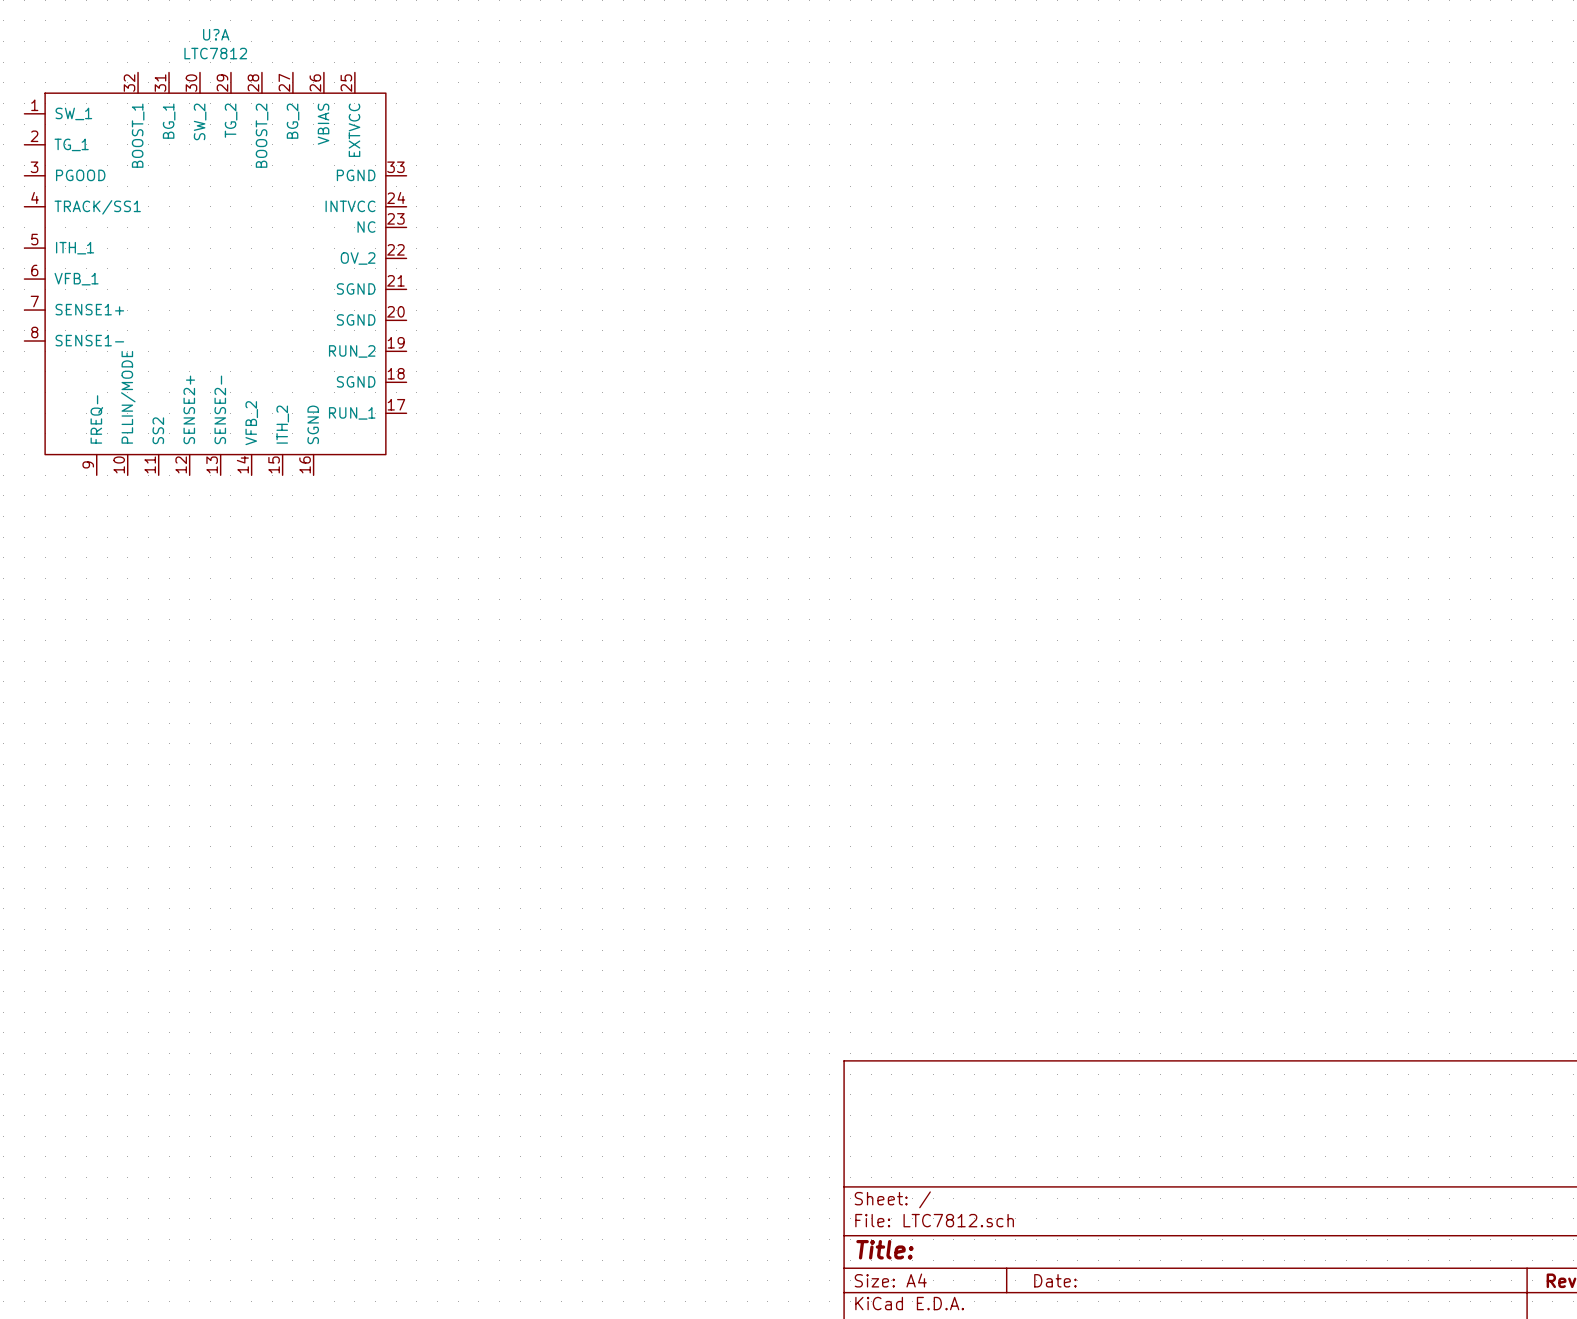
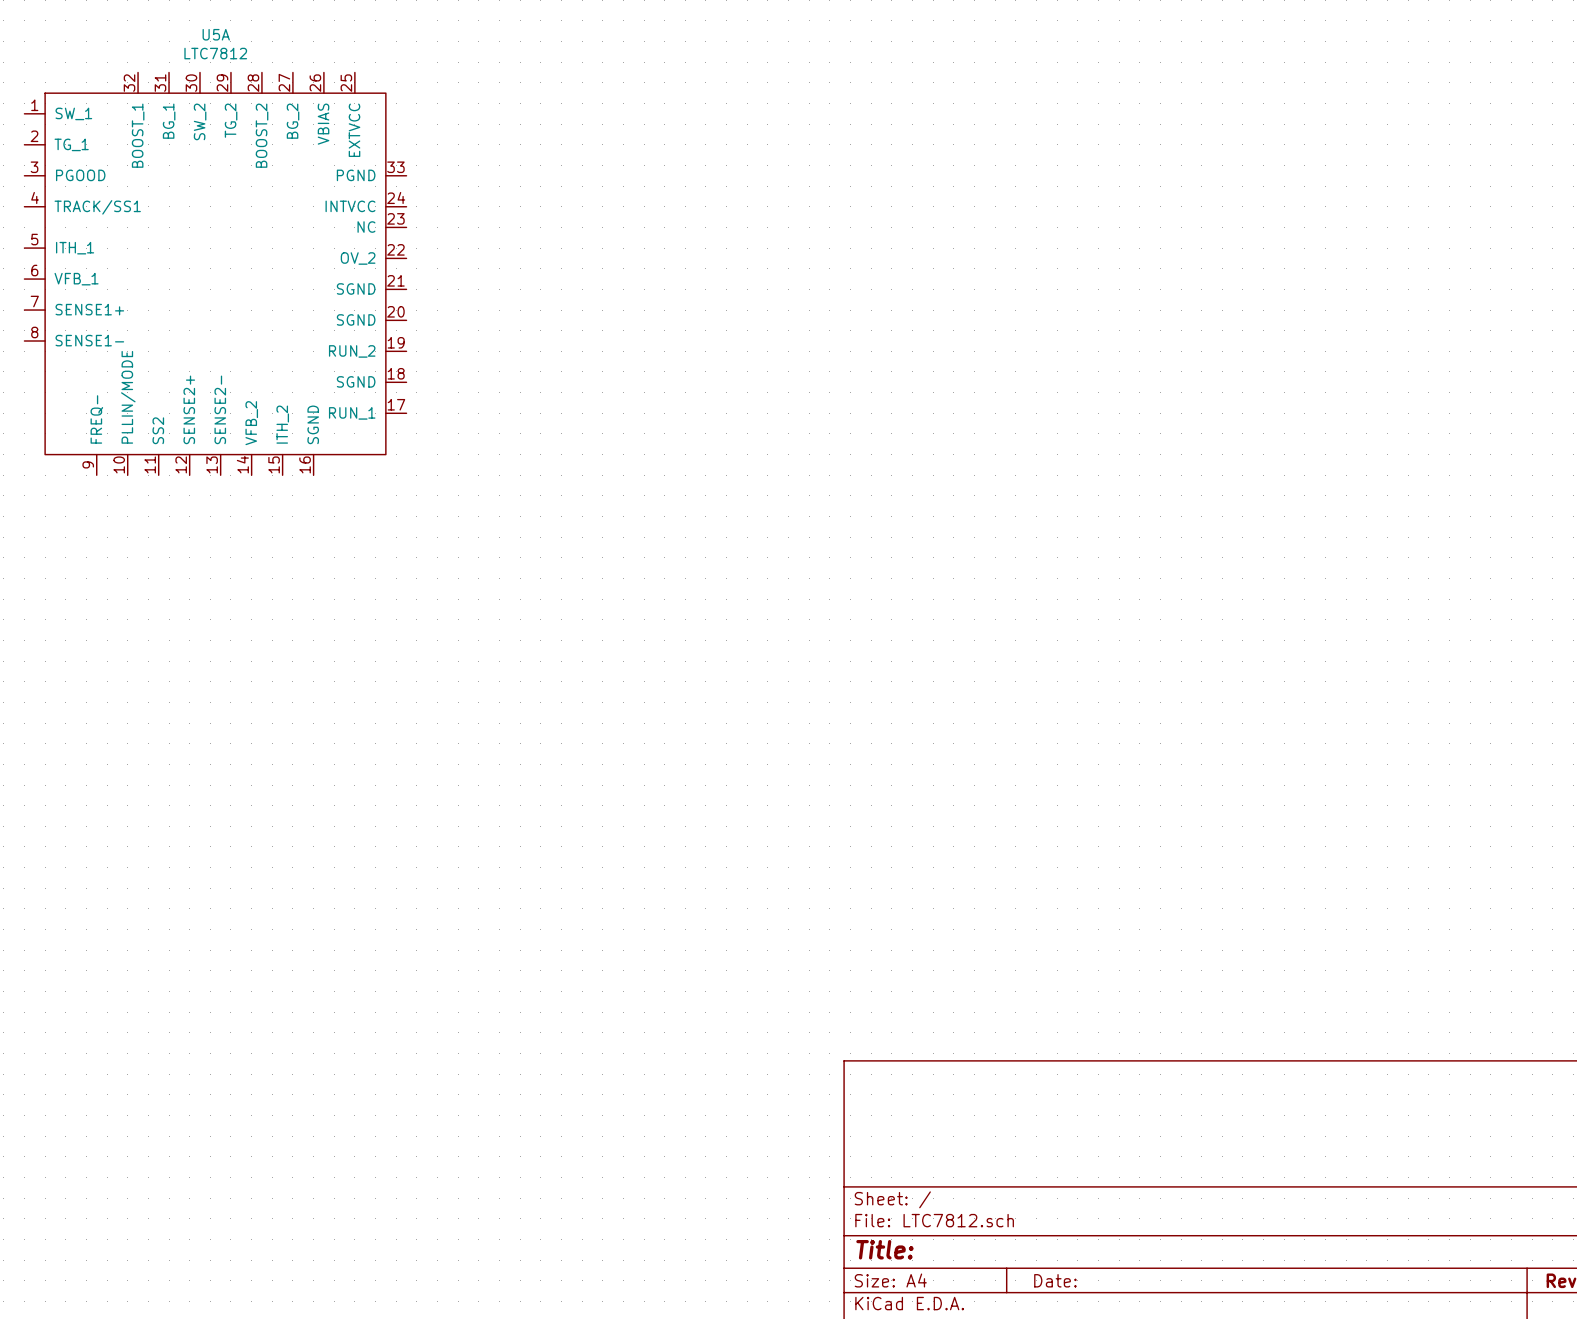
U?A name: U?A (216, 34) -> U5A (216, 34)

